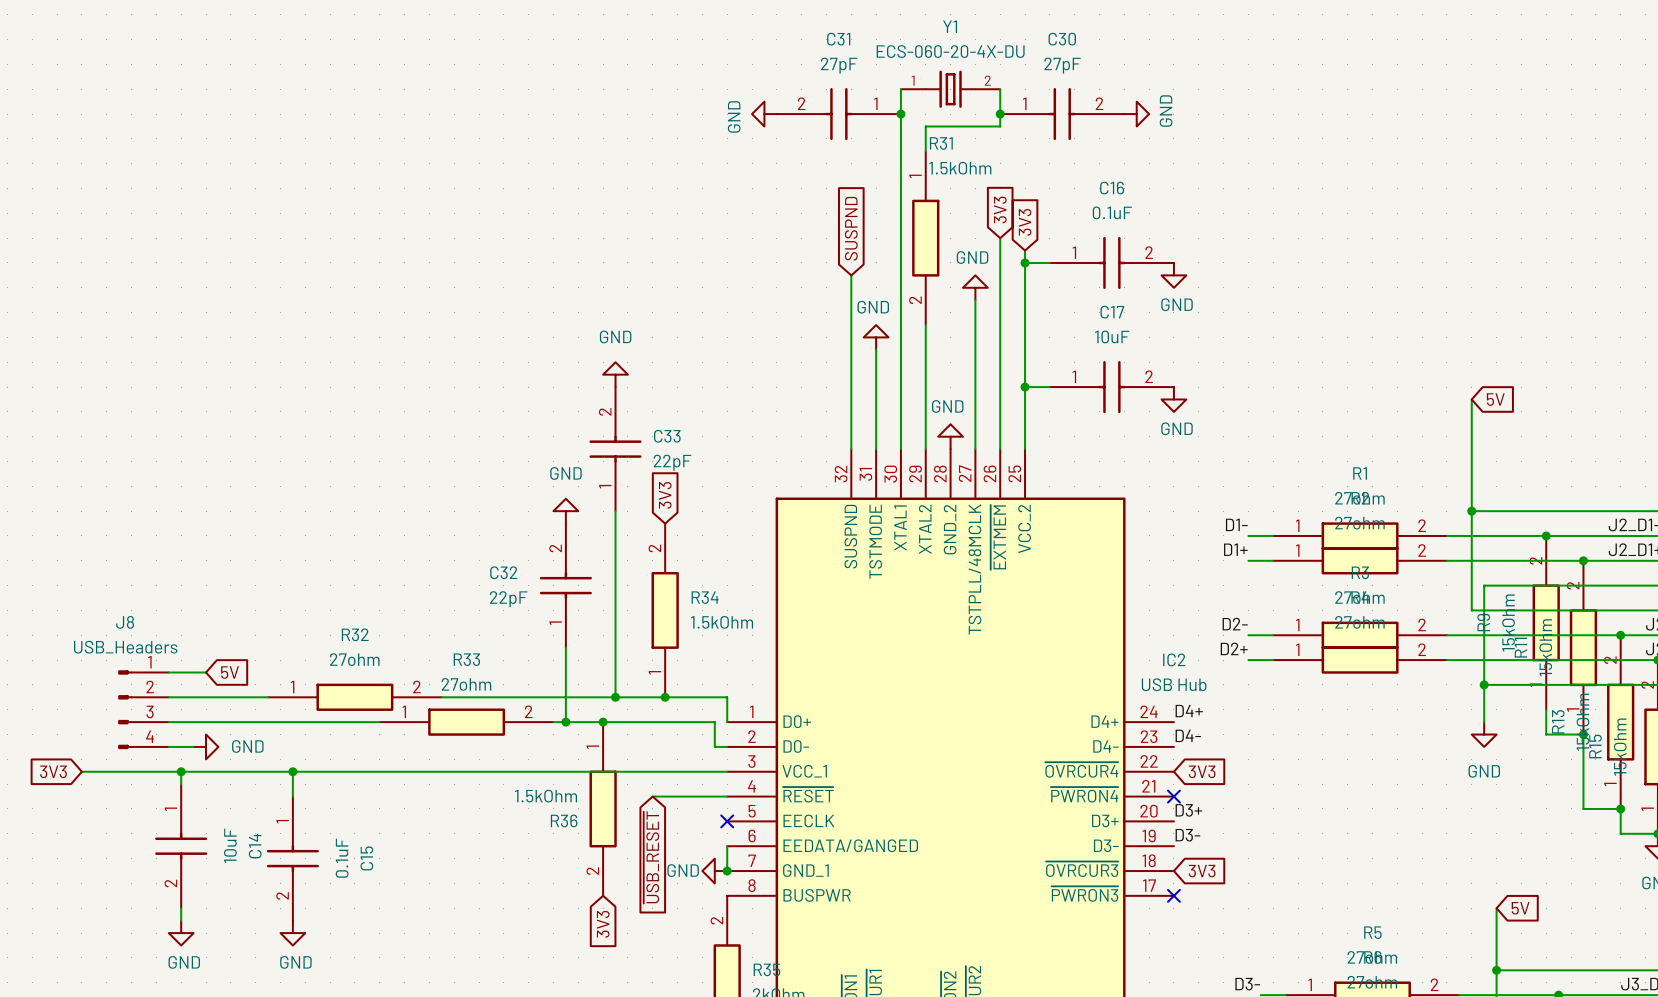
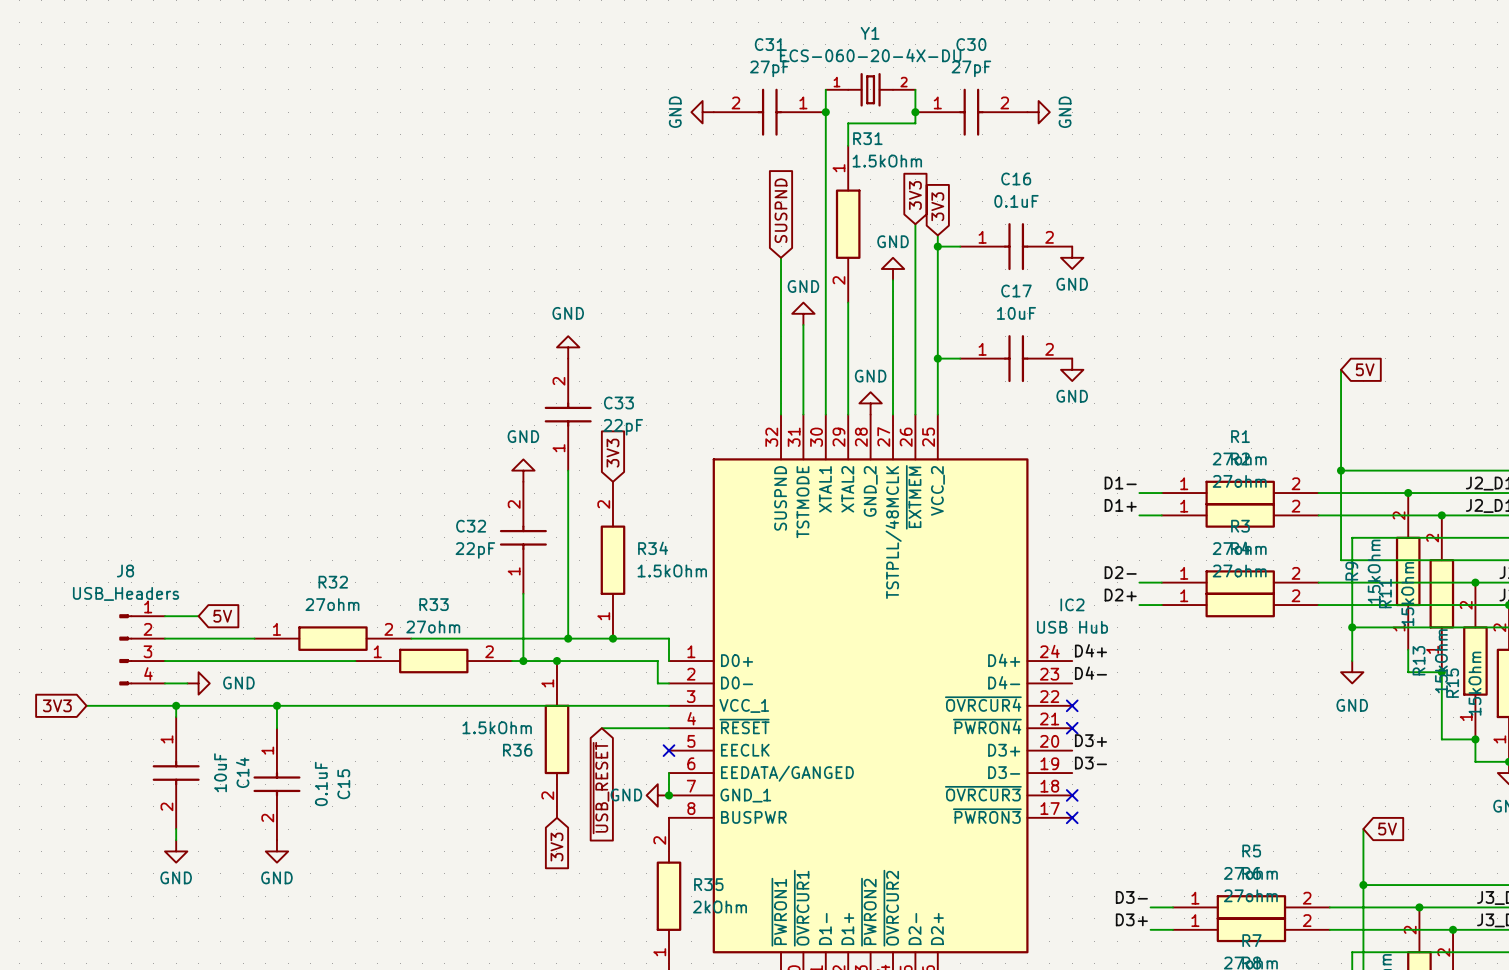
no-connect mark: none -> (1072, 705)
global label: 3V3 (1202, 771) -> none
no-connect mark: none -> (1072, 795)
global label: 3V3 (1202, 871) -> none

